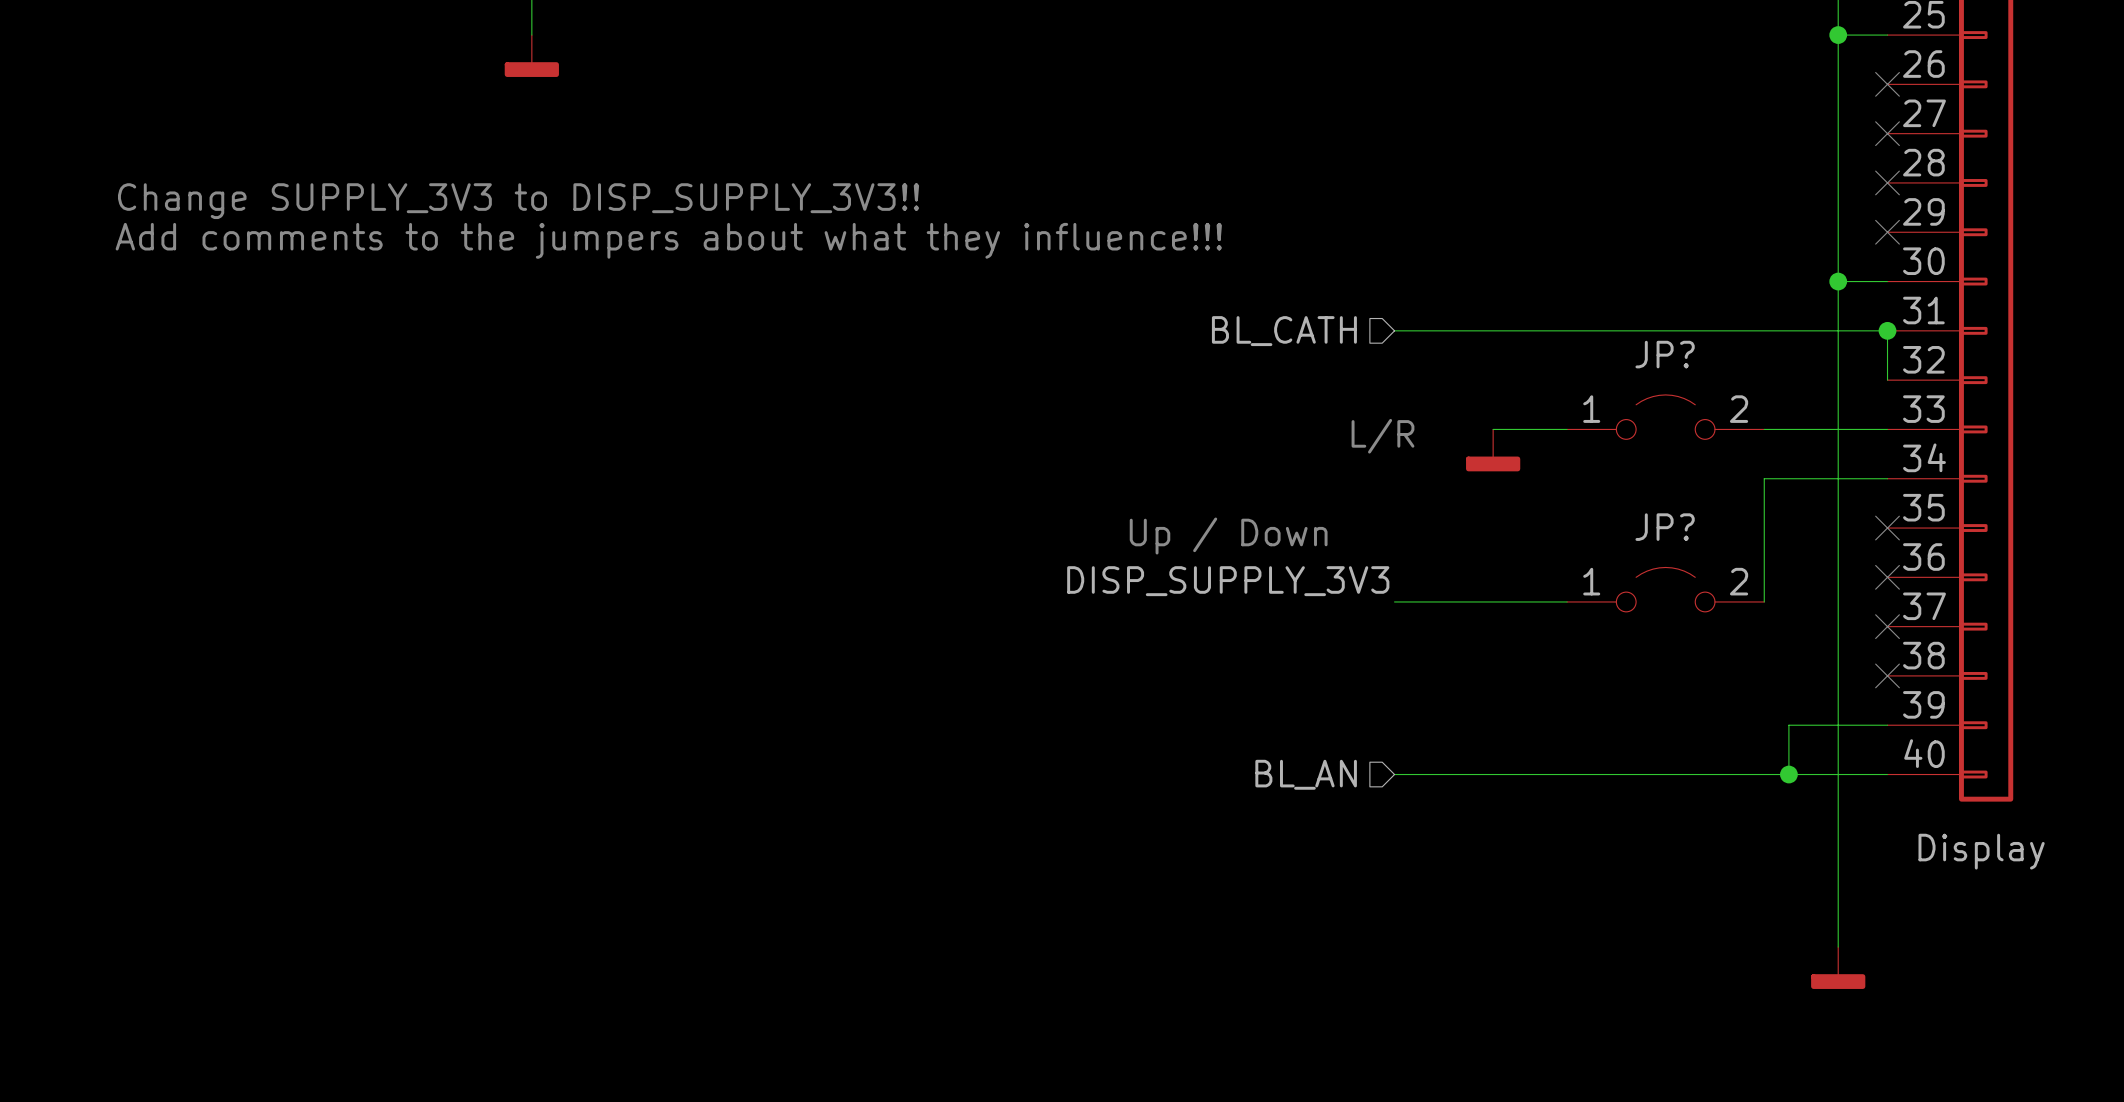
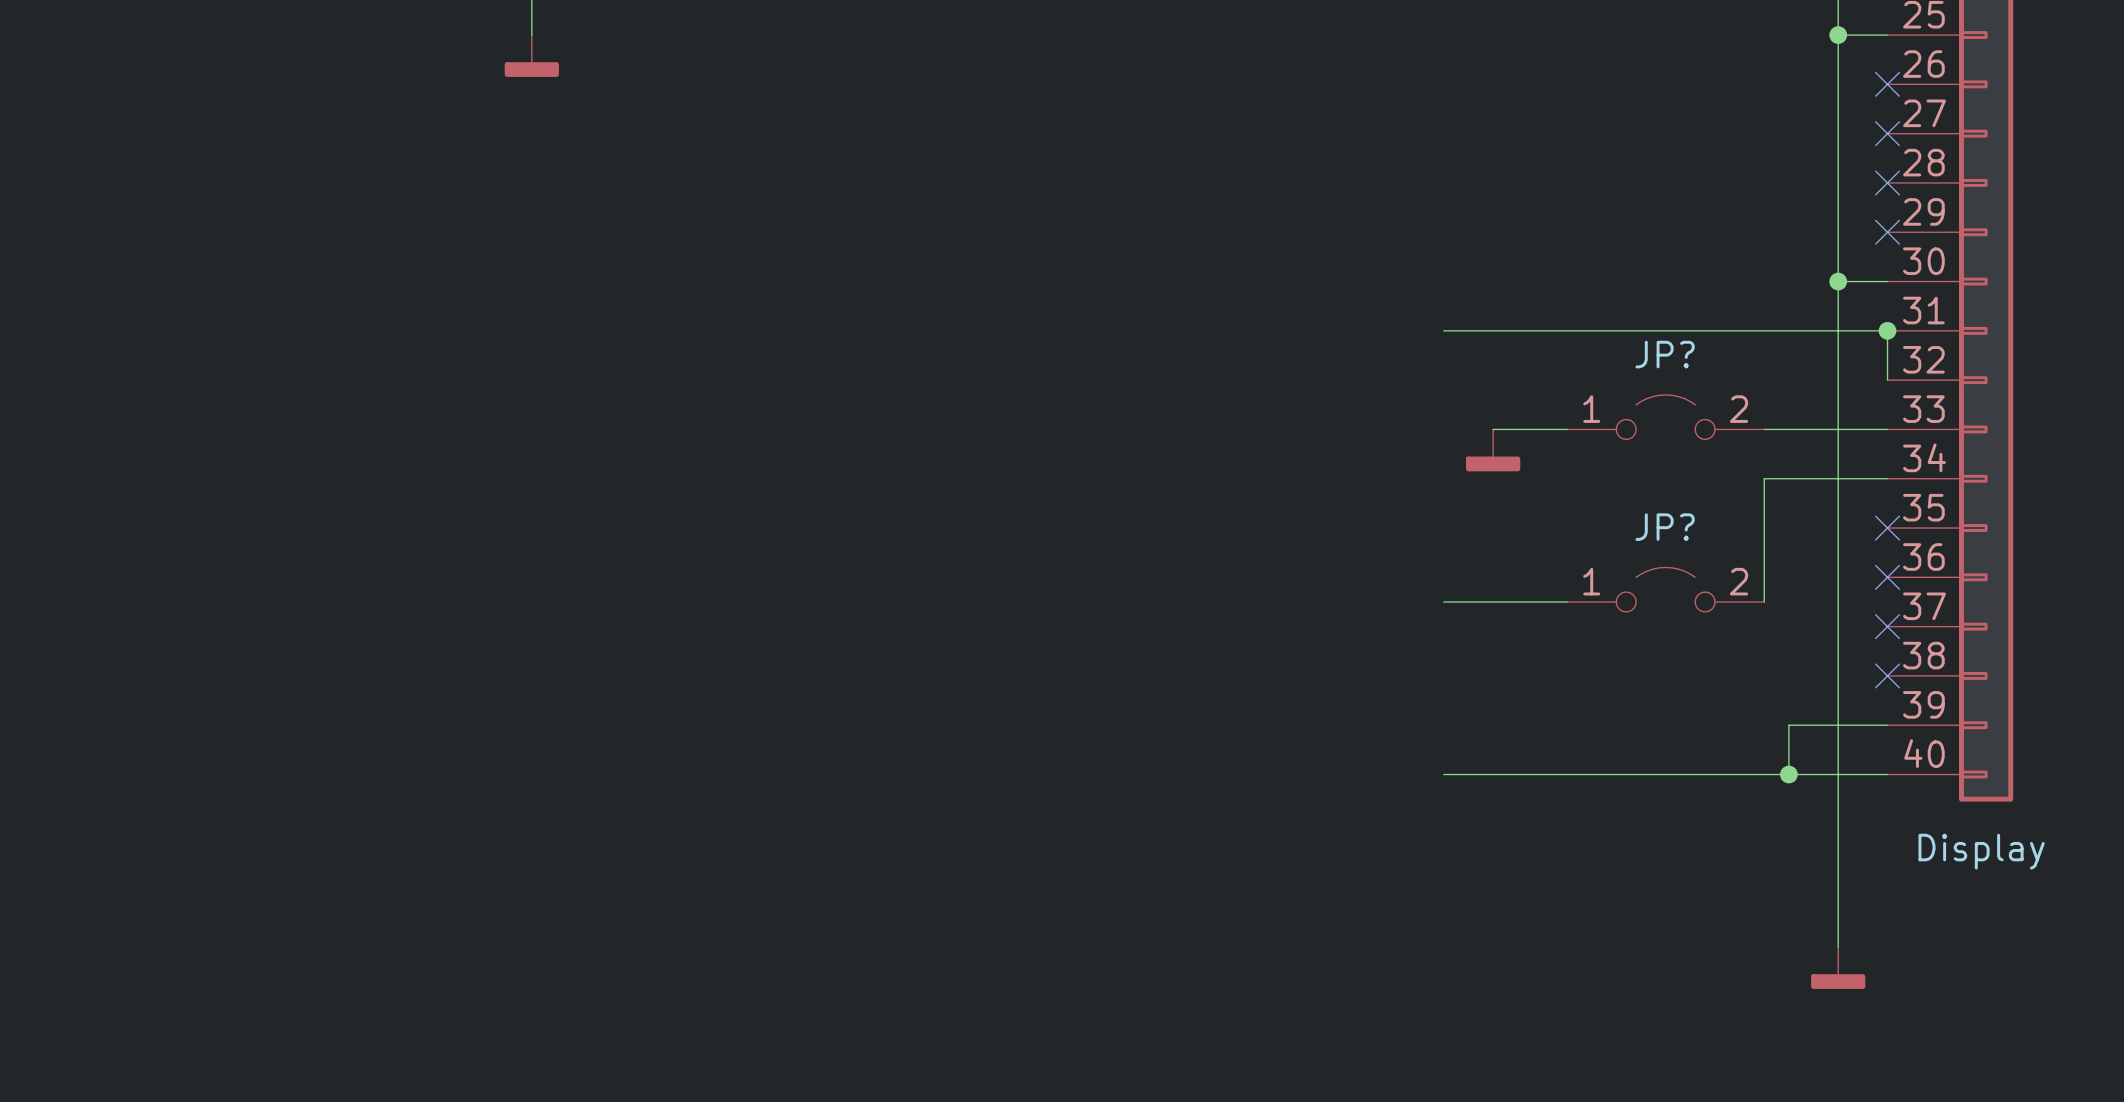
text: Change SUPPLY_3V3 to DISP_SUPPLY_3V3!! (518, 201) -> none
text: Add comments to the jumpers about what they influence!!! (668, 240) -> none
wire: (1394, 330) (1443, 330) -> none
hierarchical label: BL_CATH (1284, 331) -> none
text: L/R (1382, 436) -> none
text: Up / Down (1228, 536) -> none
label: DISP_SUPPLY_3V3 (1228, 581) -> none
wire: (1394, 601) (1443, 601) -> none
hierarchical label: BL_AN (1306, 774) -> none
wire: (1394, 774) (1443, 774) -> none

